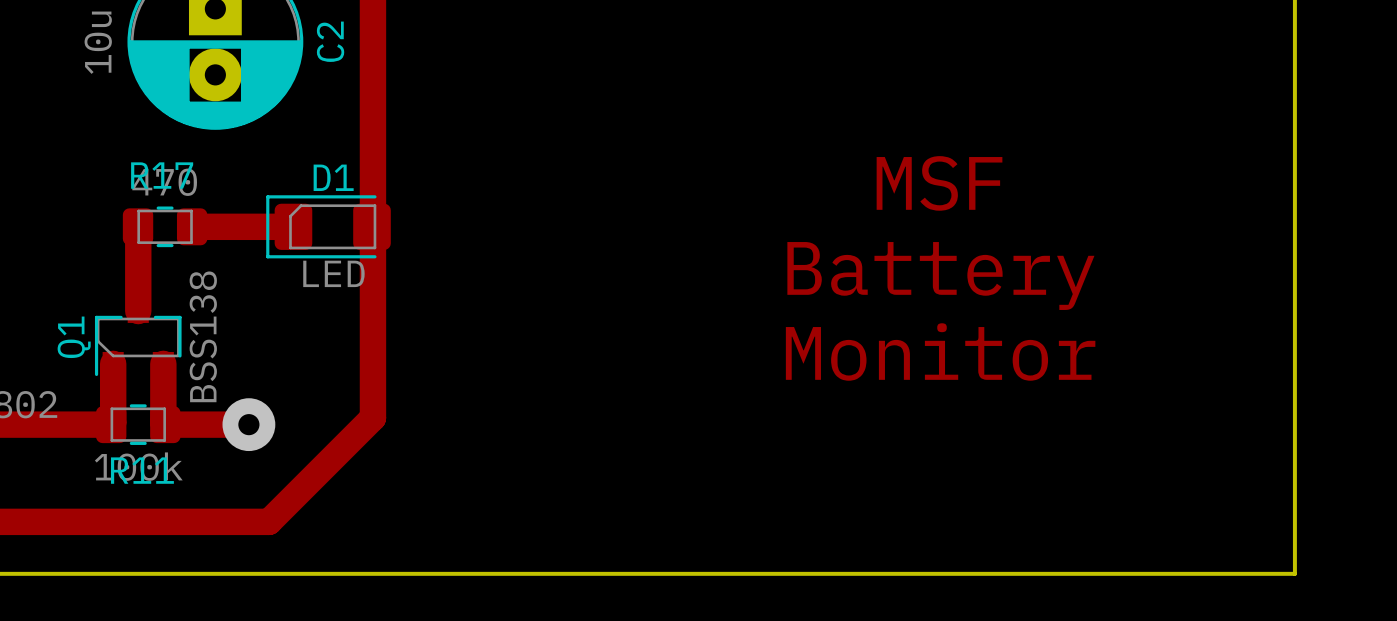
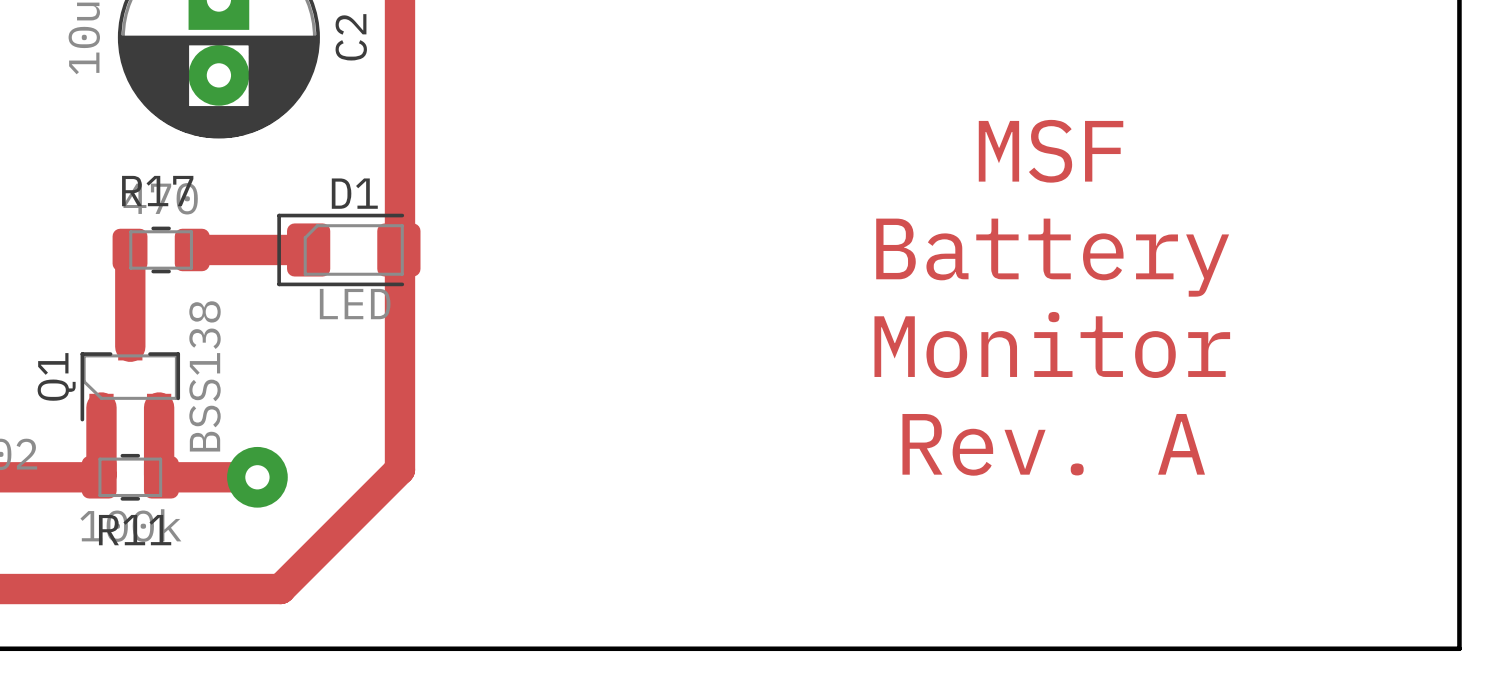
text position: MSF (939, 183) -> MSF (1051, 151)
text position: Battery (940, 275) -> Battery (1052, 257)
text position: Monitor (940, 352) -> Monitor (1052, 344)
text: none -> Rev. A (1053, 444)

